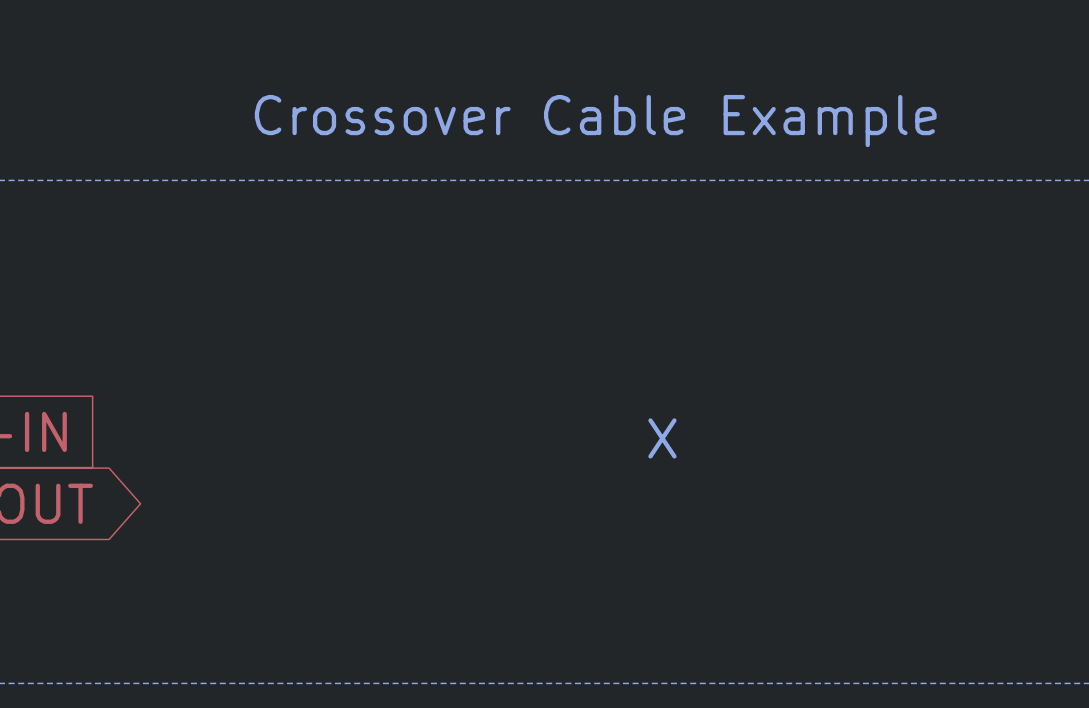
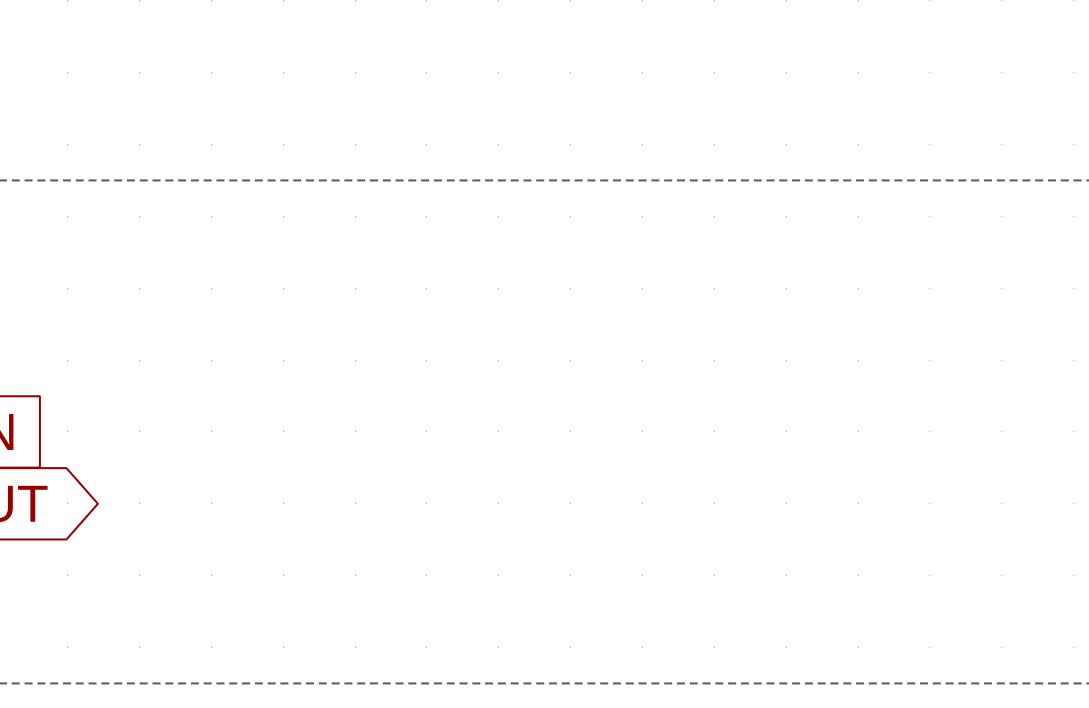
text: Crossover Cable Example (595, 121) -> none
text: X (662, 438) -> none

